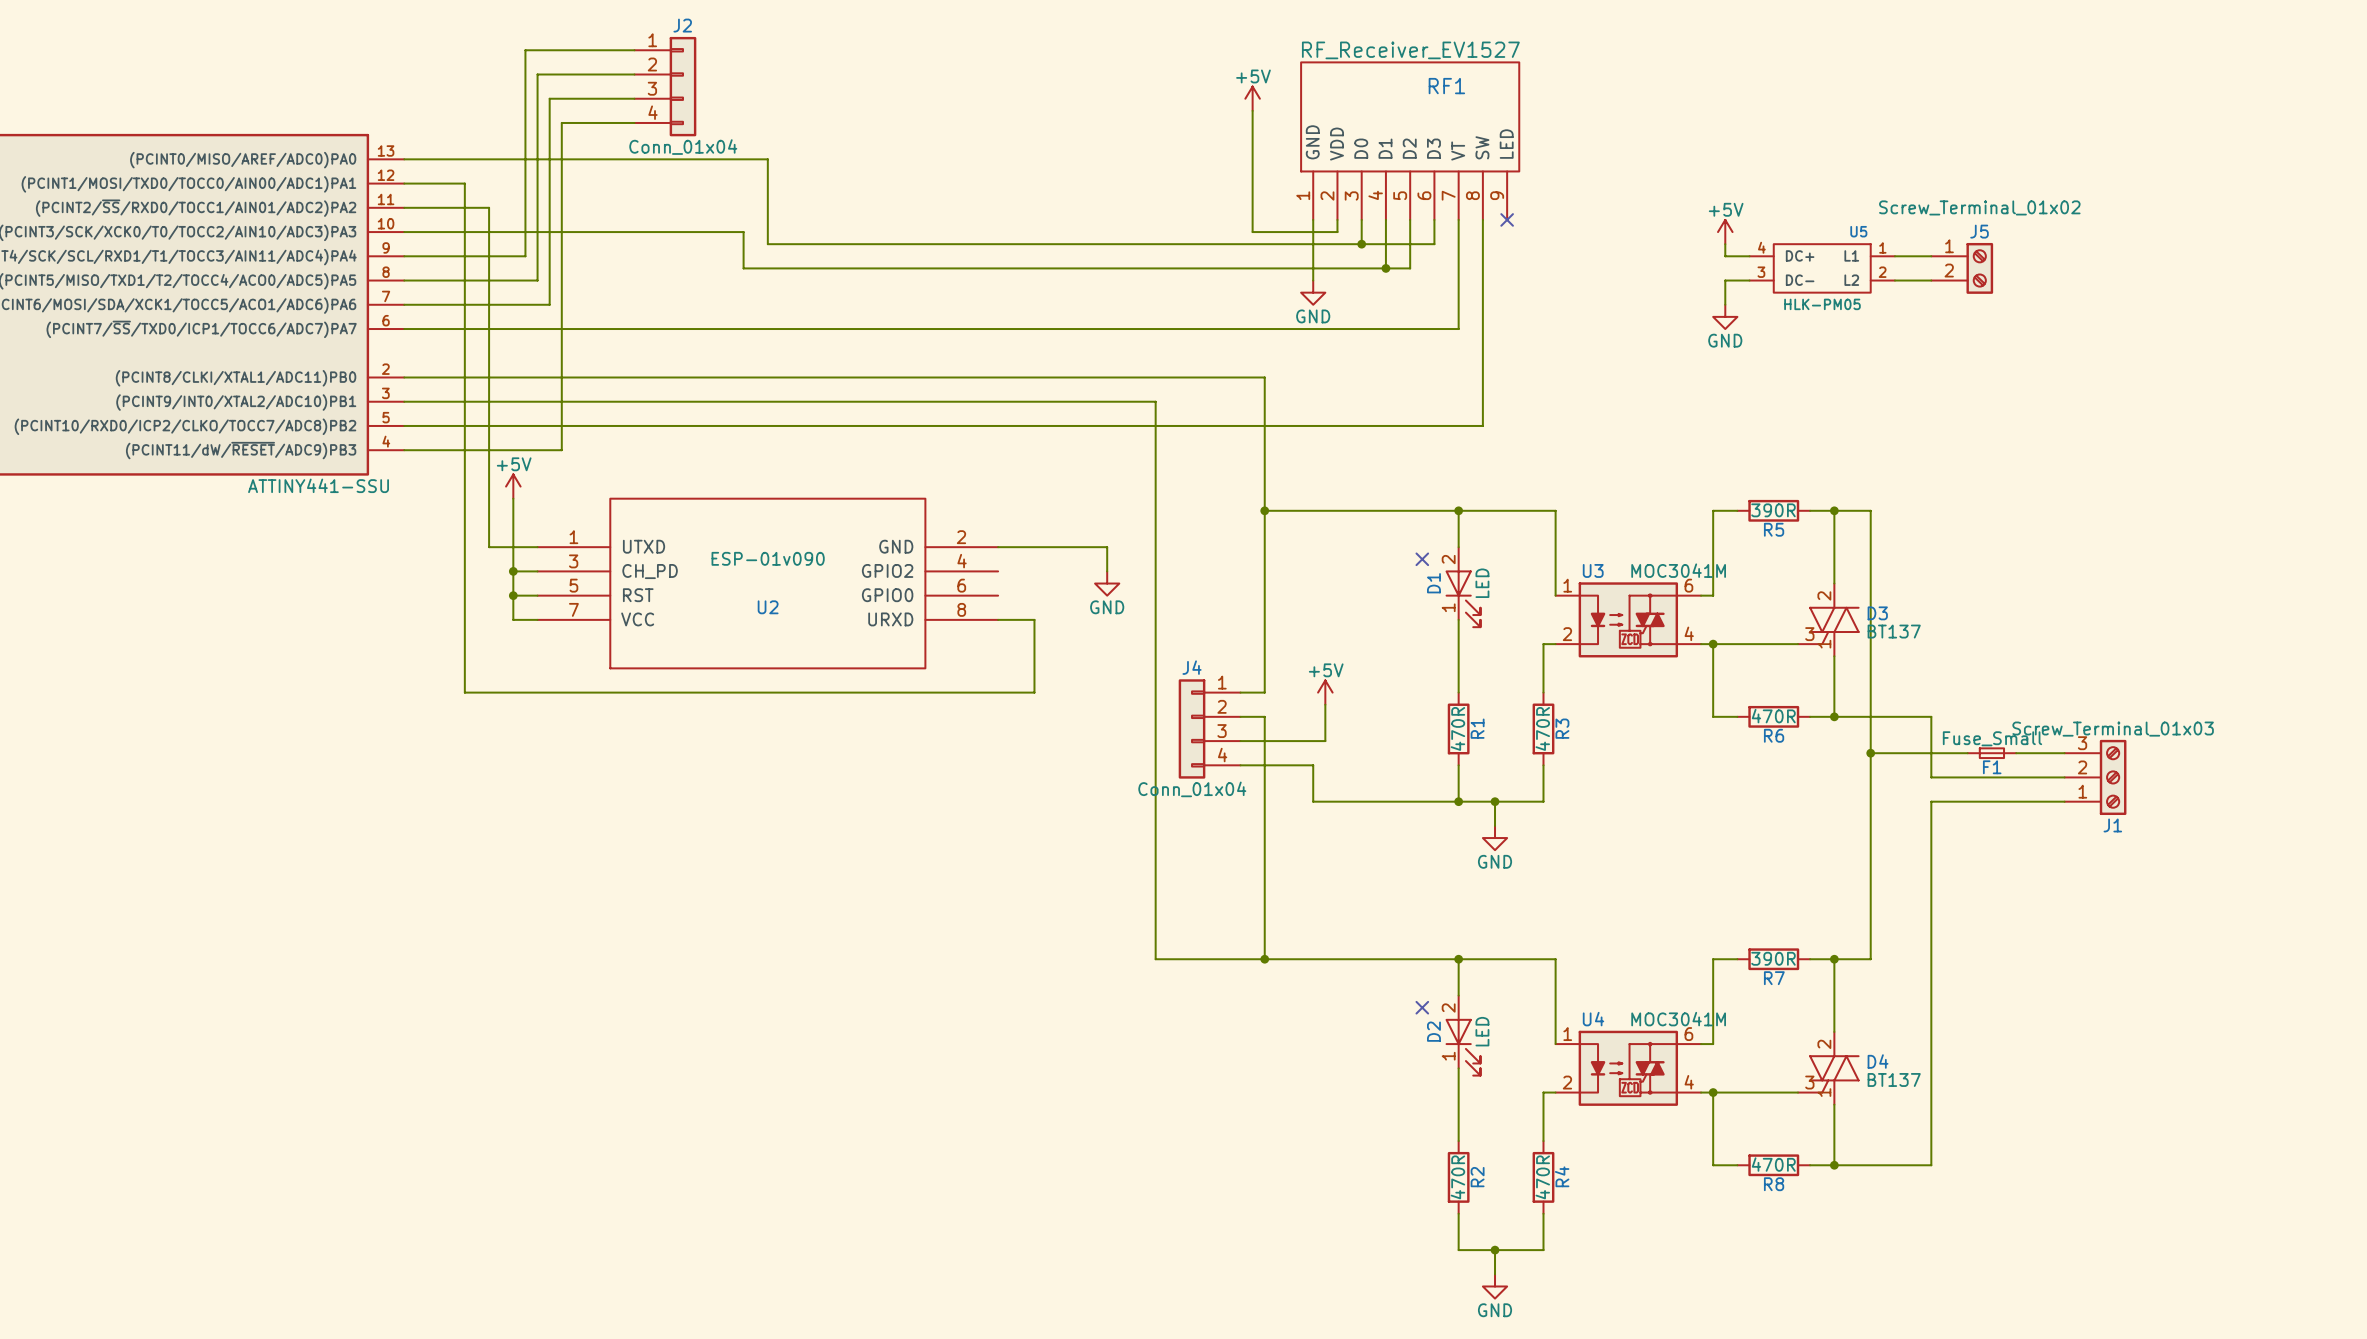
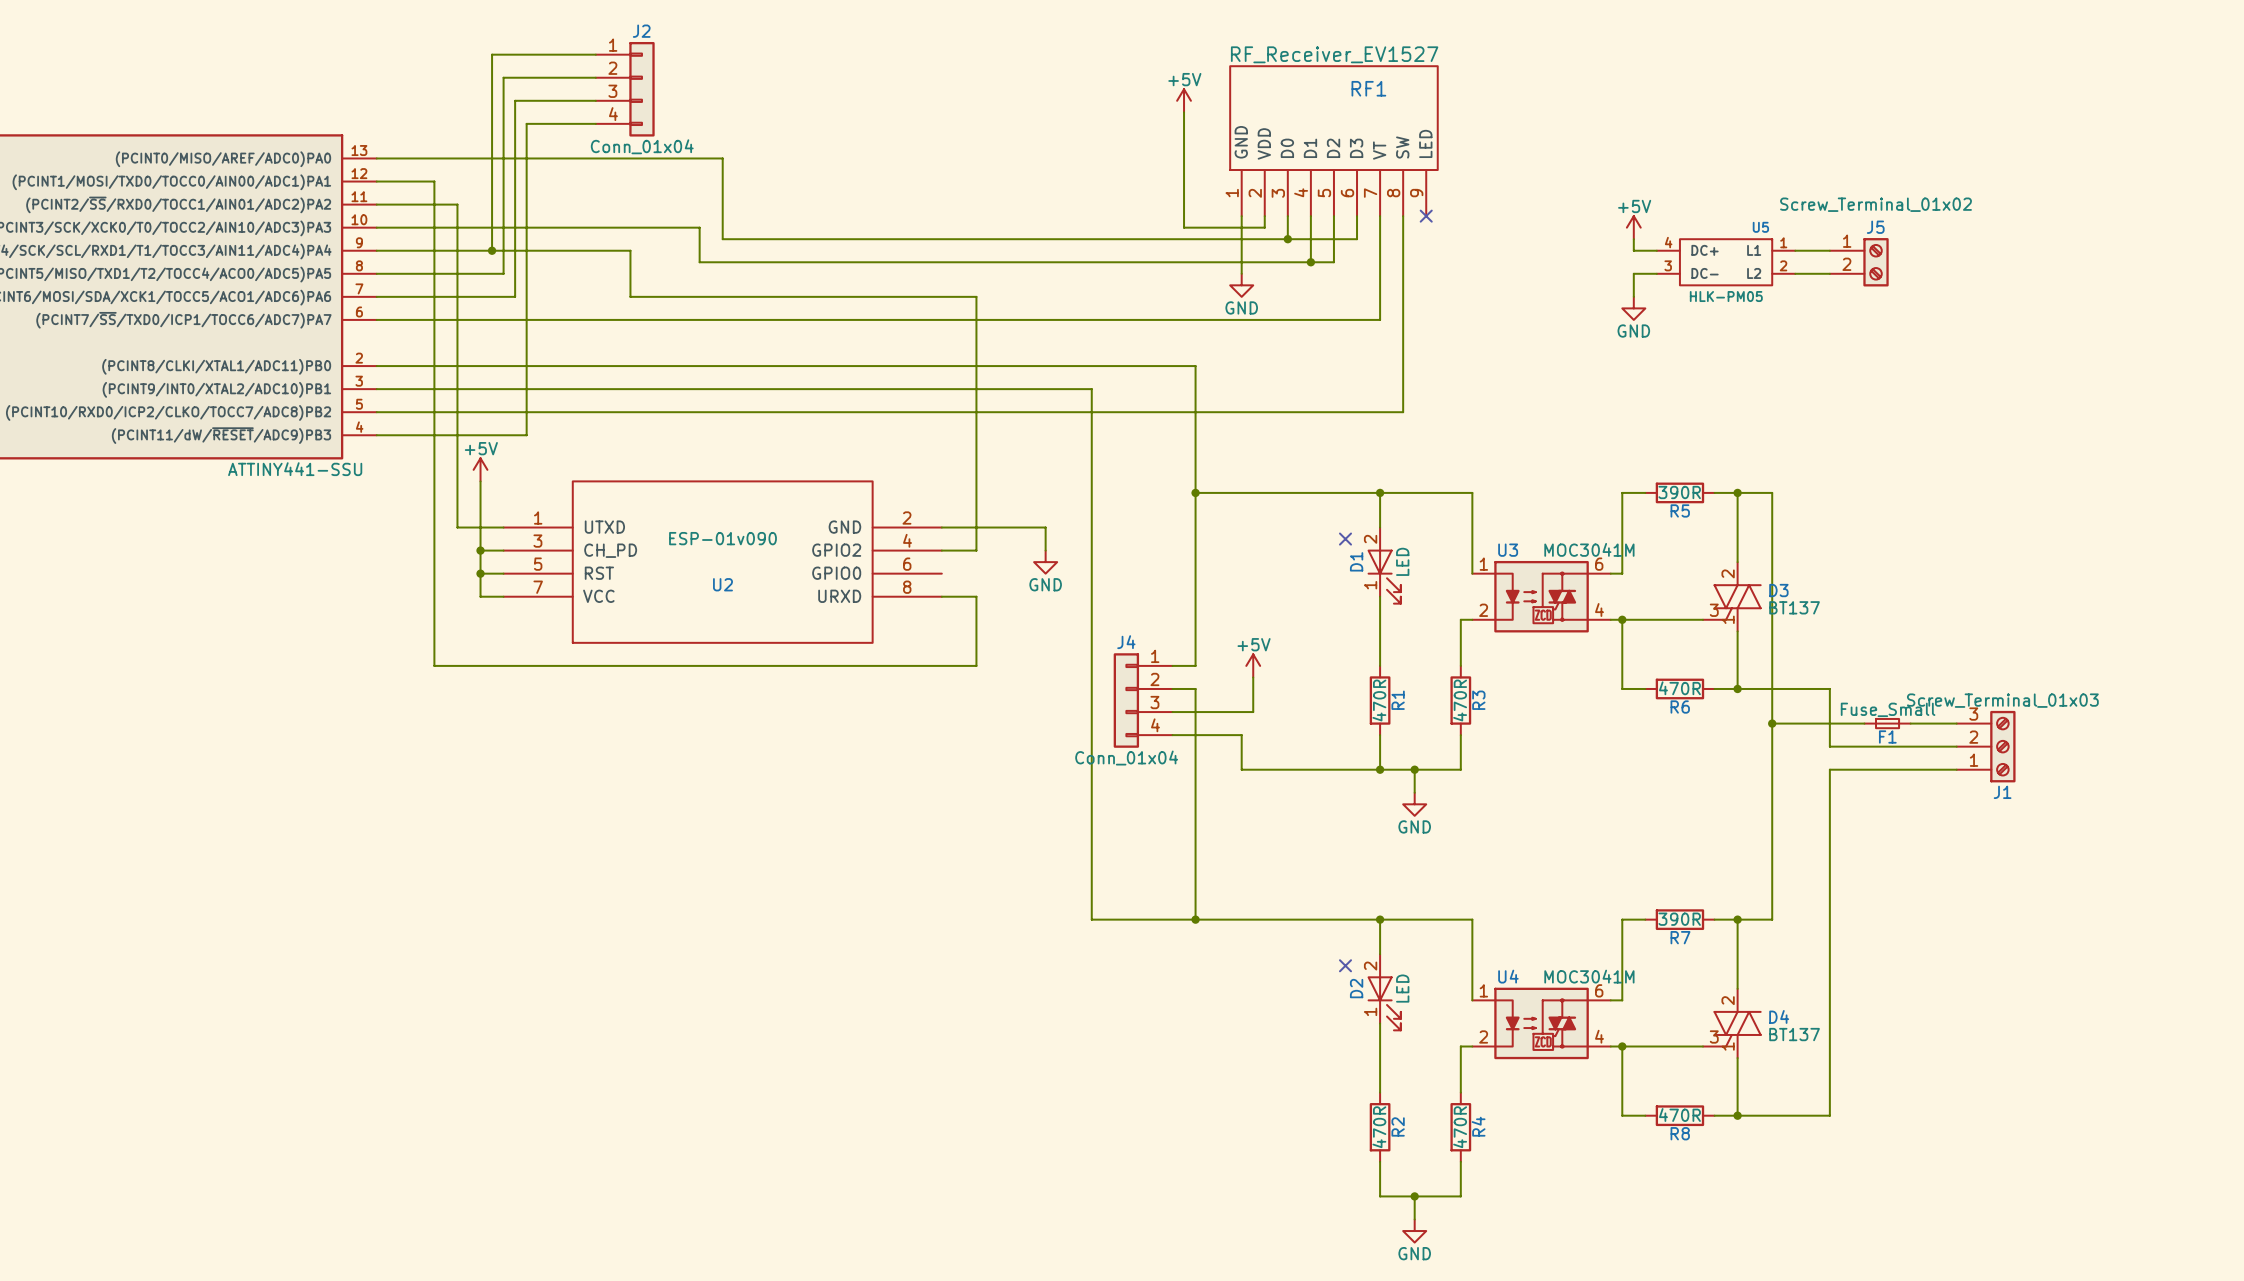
wire: none -> (492, 250) (630, 250) (630, 296) (976, 296) (976, 550) (941, 550)
junction: none -> (492, 250)

